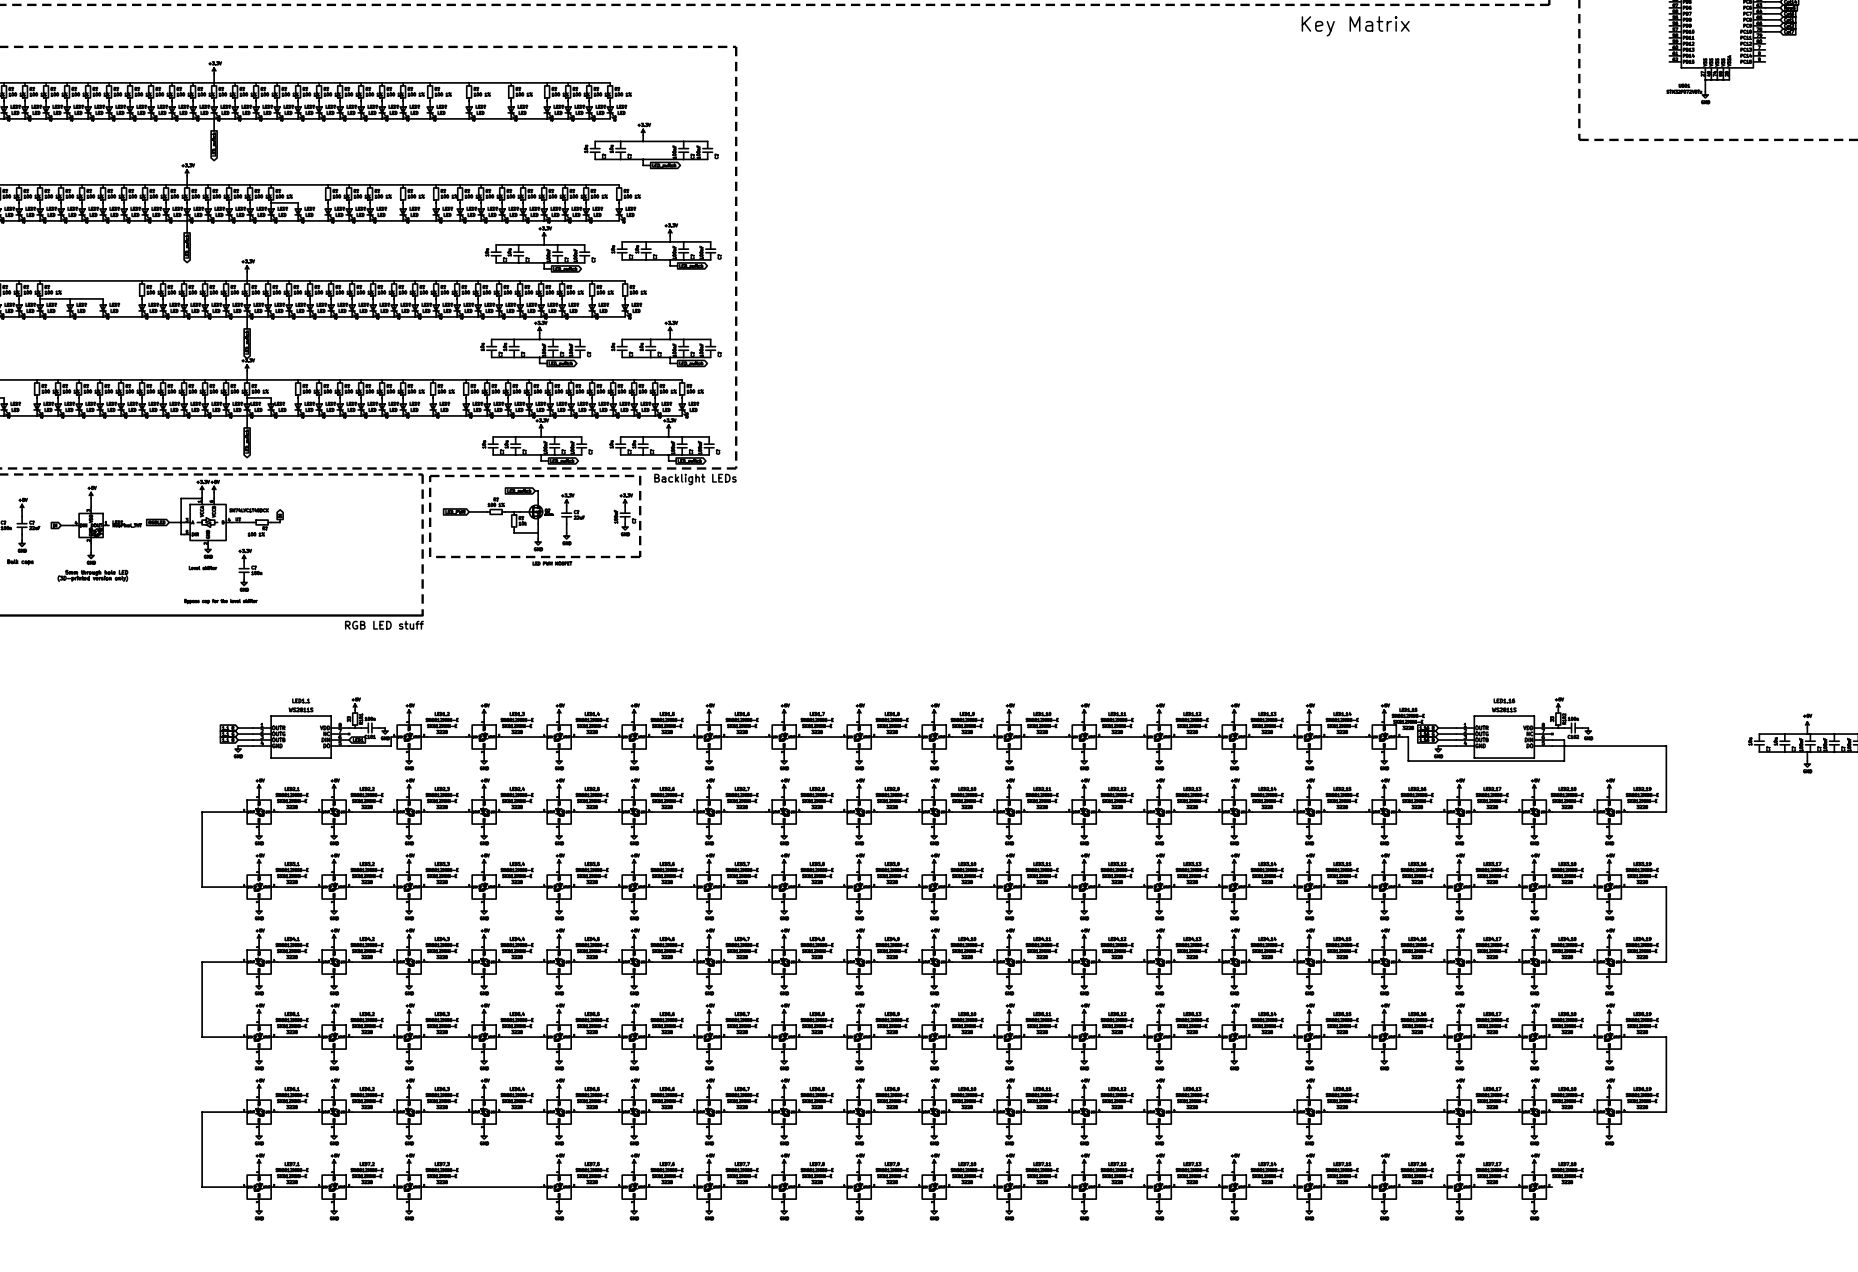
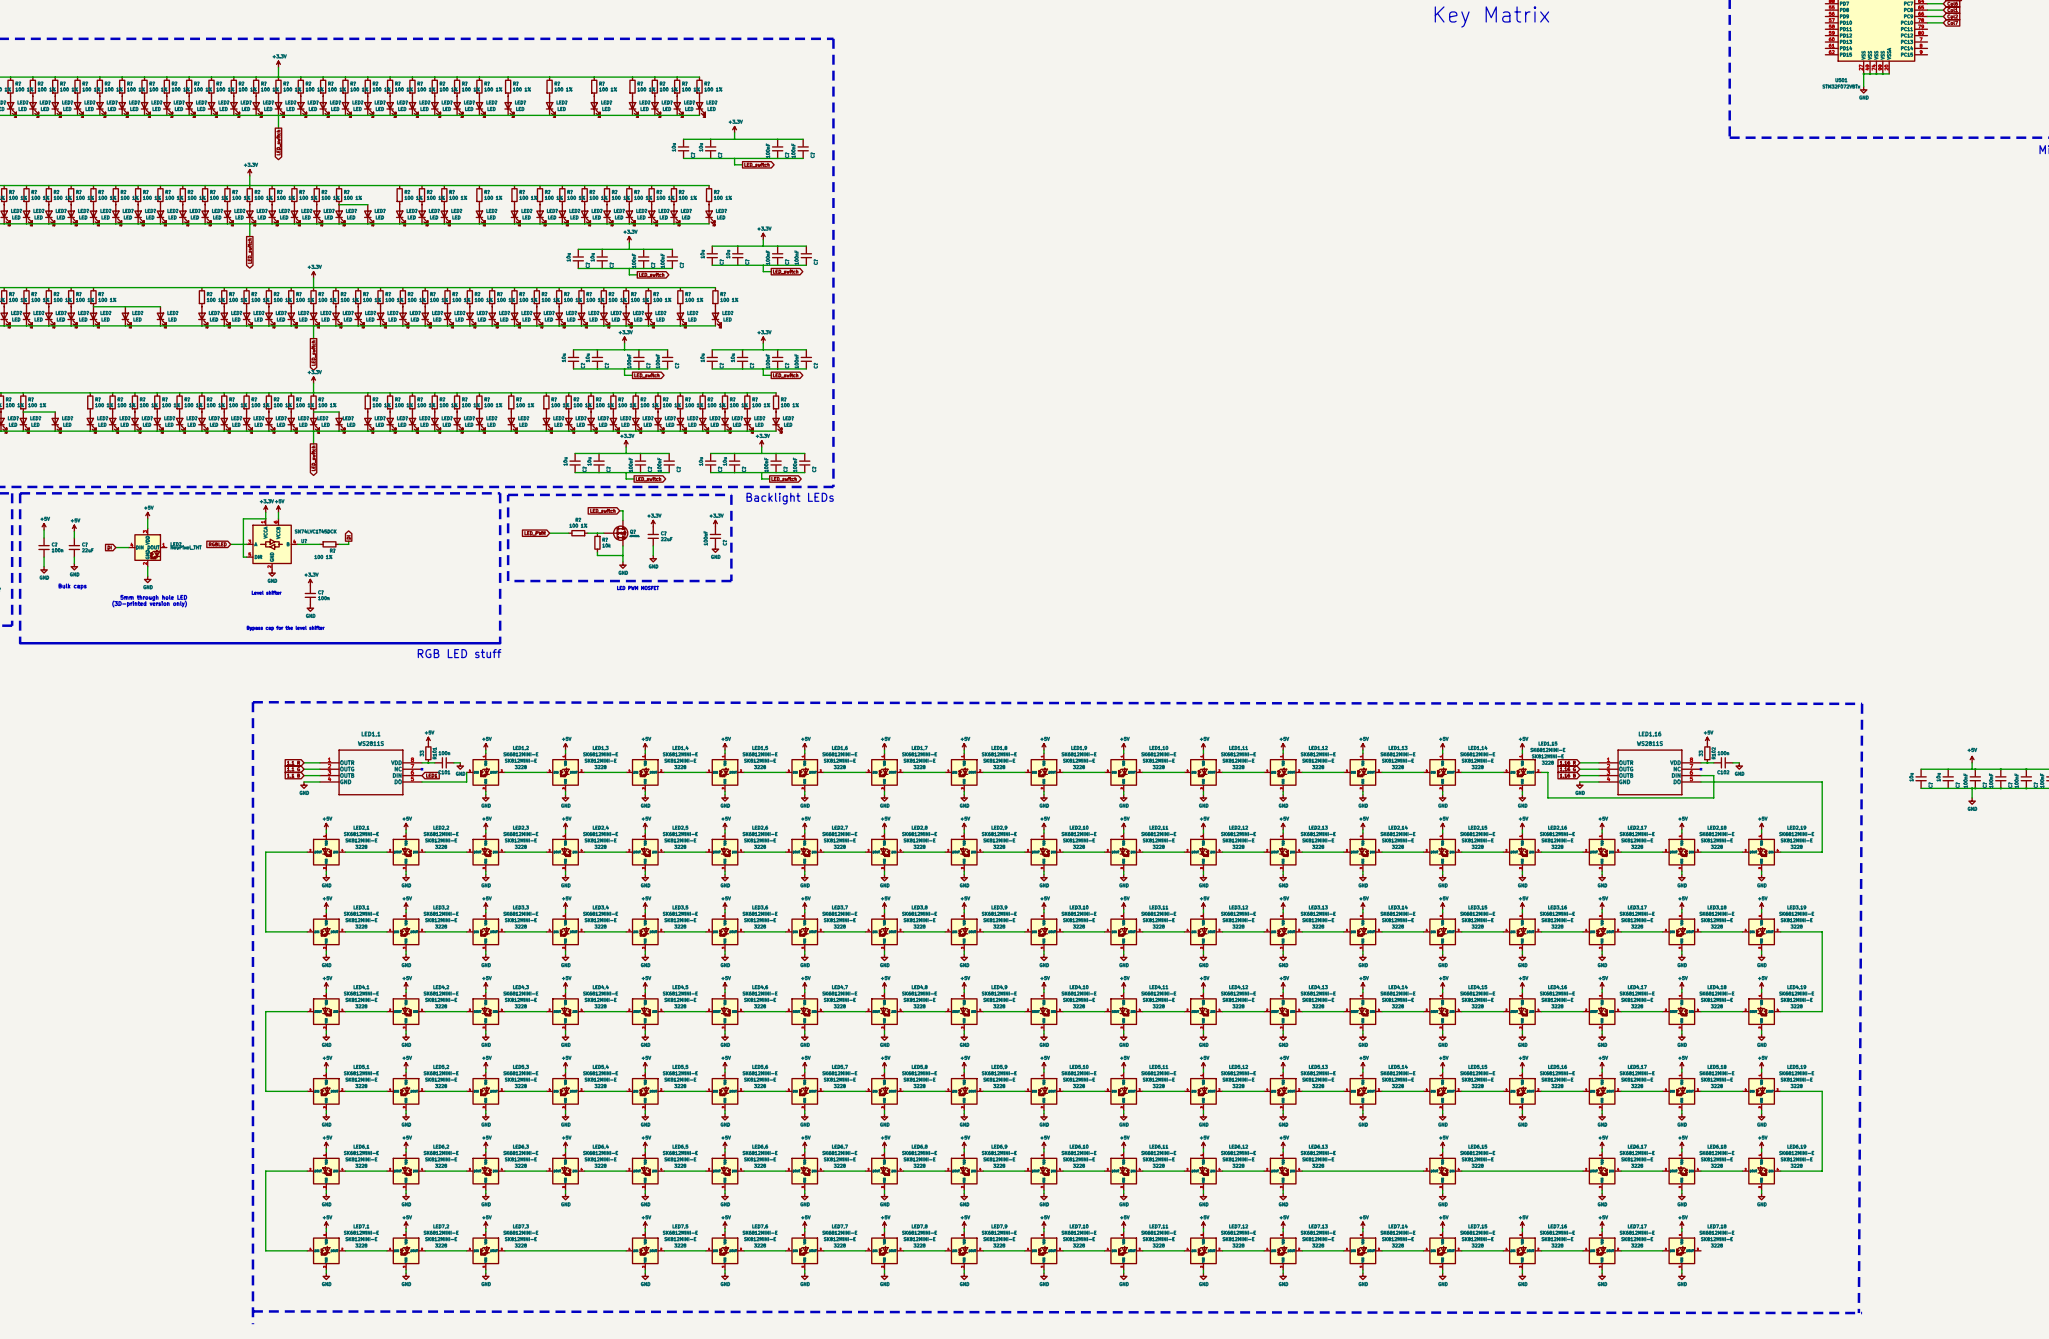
line: none -> (252, 1311) (1862, 1313)
line: none -> (1858, 1313) (1862, 703) (252, 702) (252, 1324)

